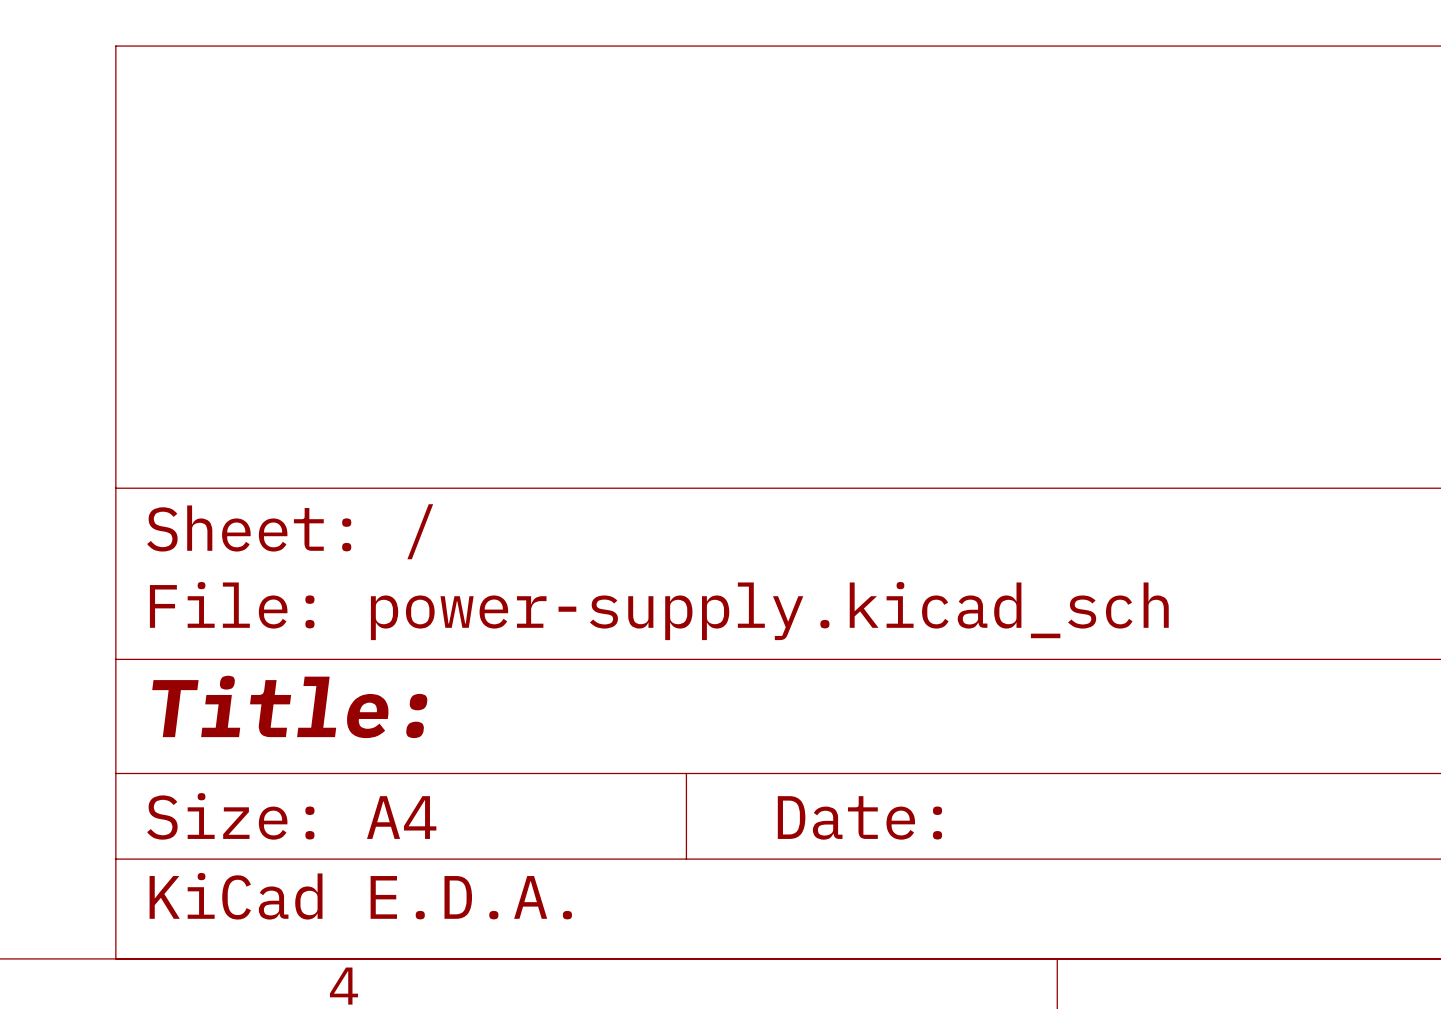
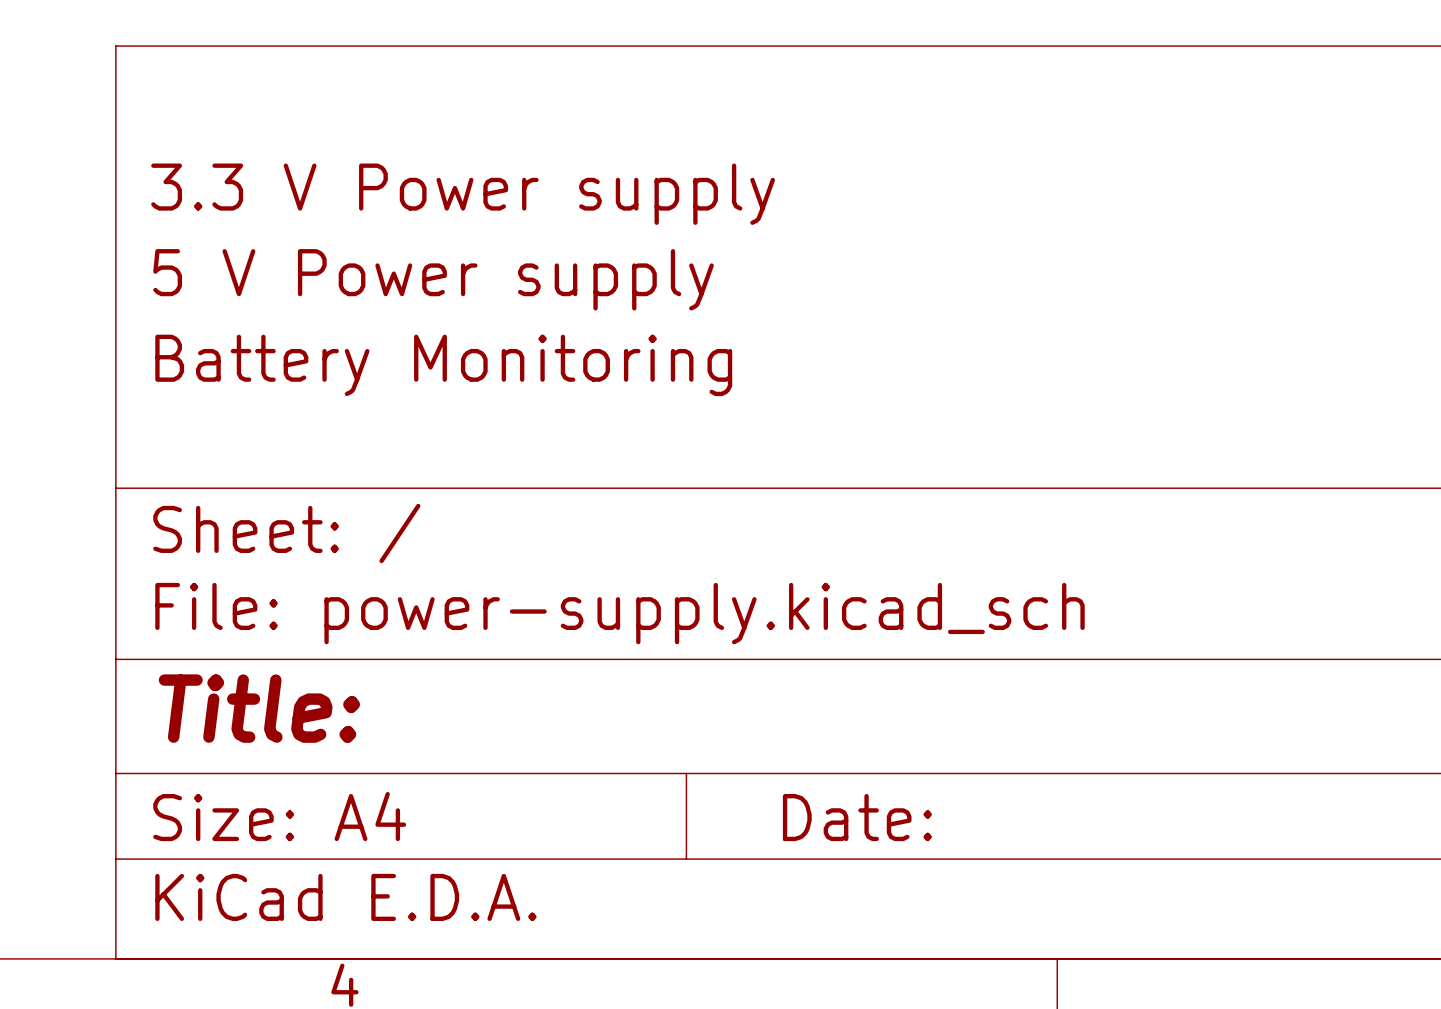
title block: none -> 3.3 V Power supply (463, 194)
title block: none -> 5 V Power supply (433, 279)
title block: none -> Battery Monitoring (443, 365)

